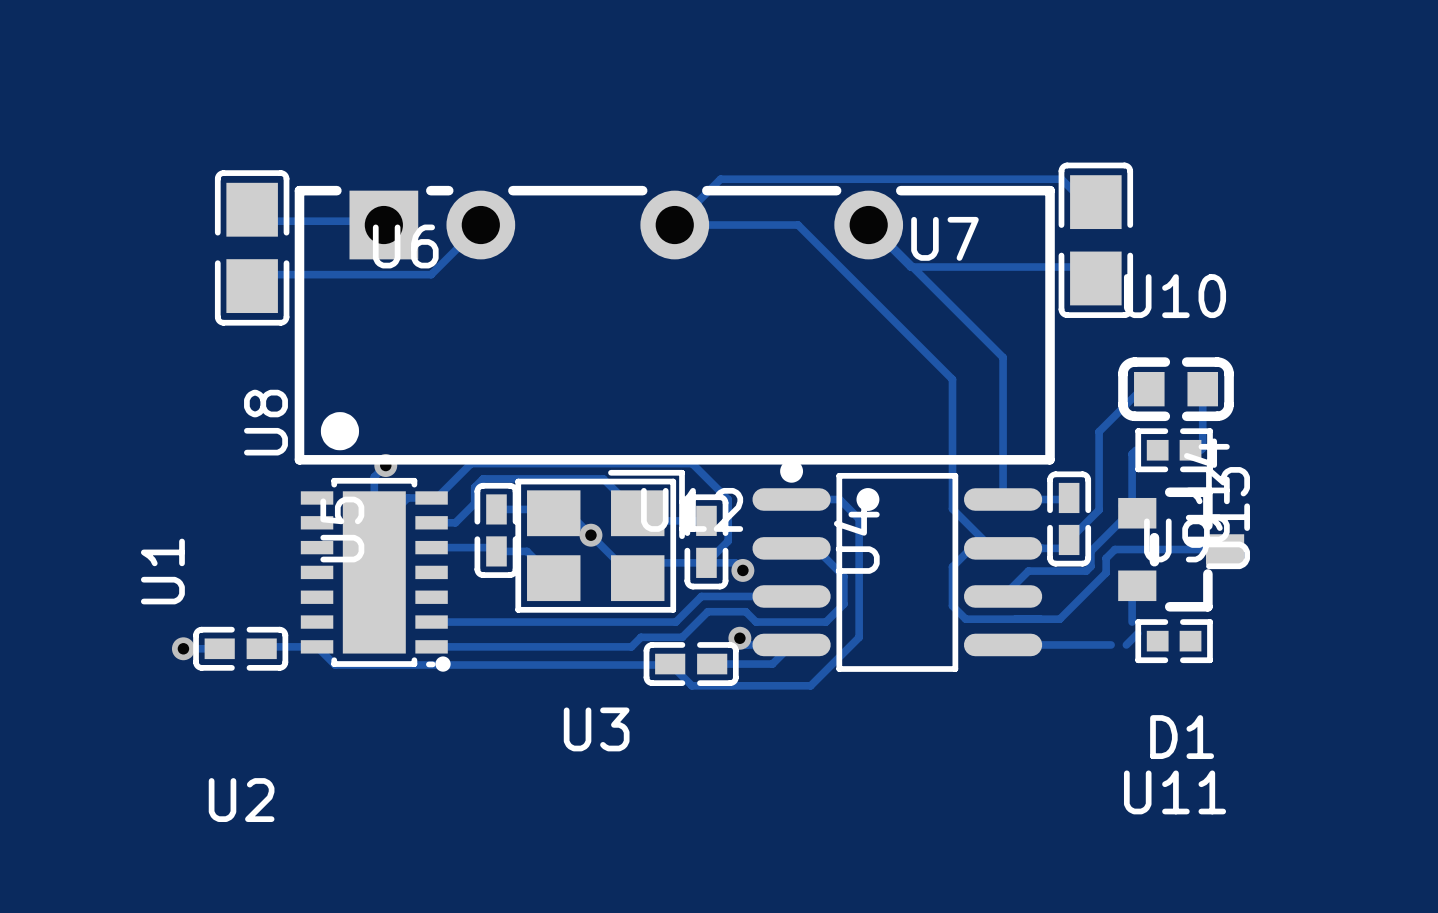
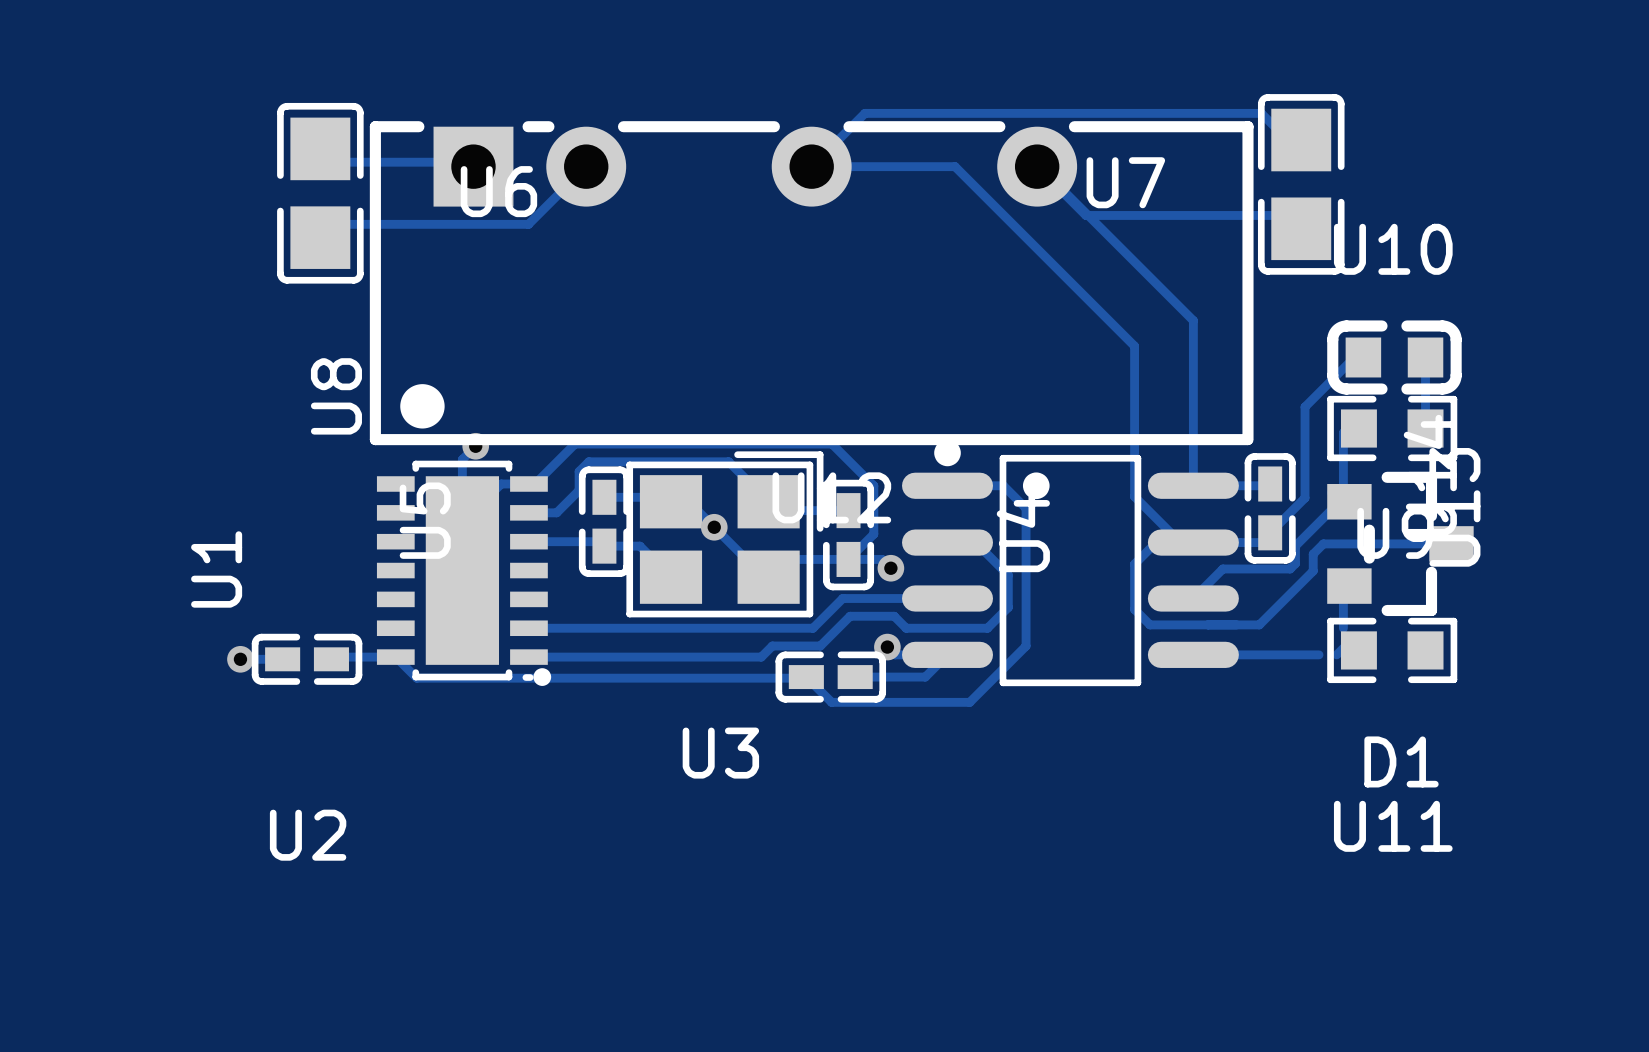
U10 footprint: [1135, 428, 1213, 473] -> [1327, 395, 1458, 462]
U11 footprint: [1135, 619, 1213, 664] -> [1327, 617, 1458, 684]

